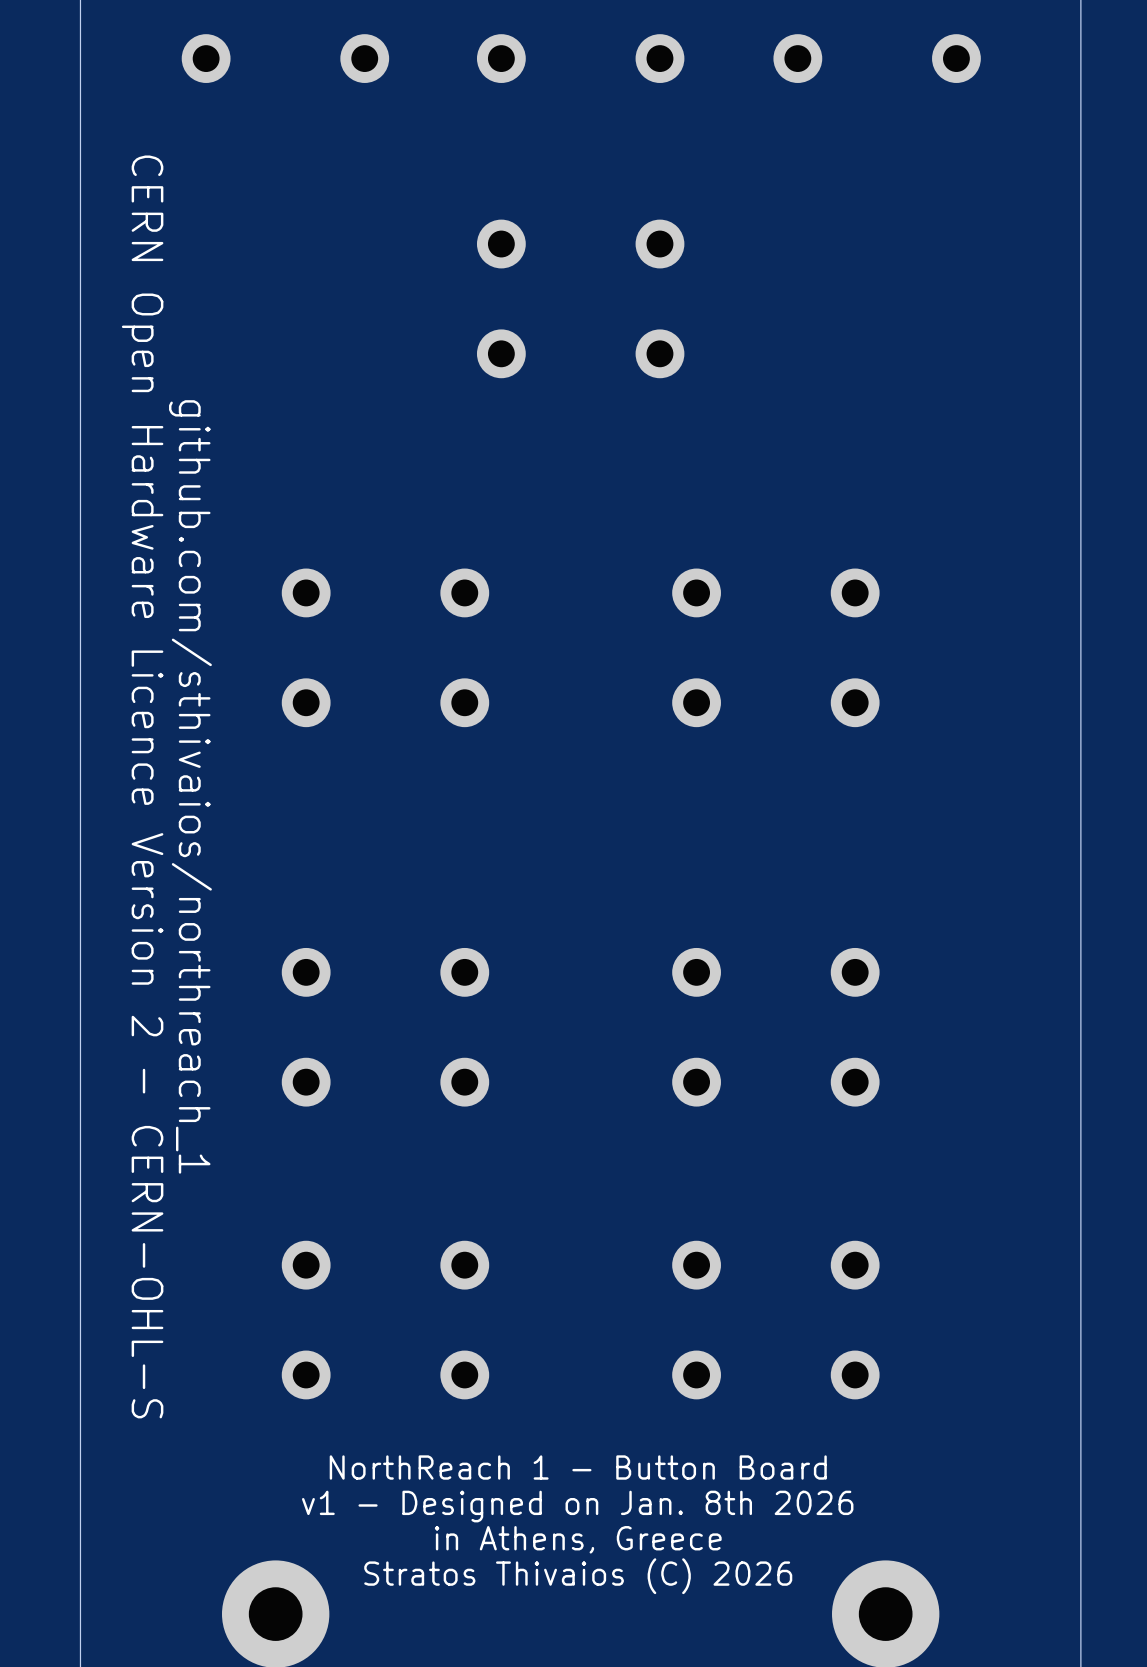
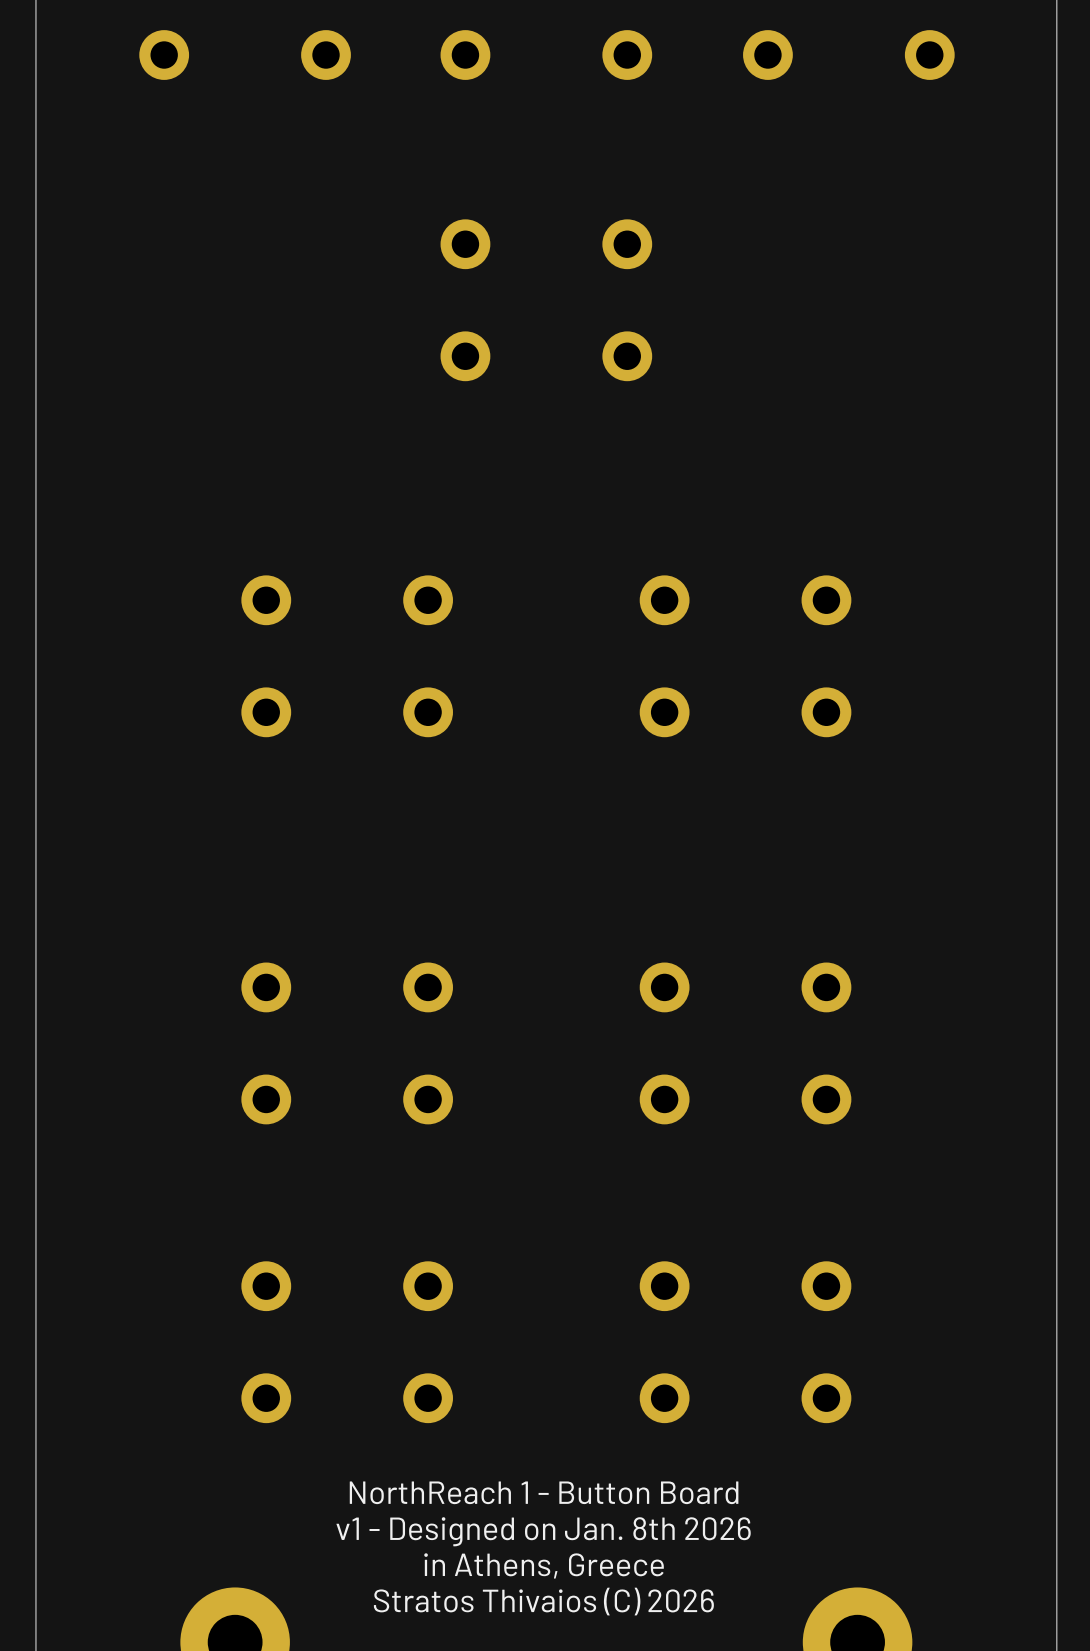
text: CERN Open Hardware Licence Version 2 - CERN-OHL-S (142, 786) -> none
text: github.com/sthivaios/northreach_1 (190, 786) -> none

